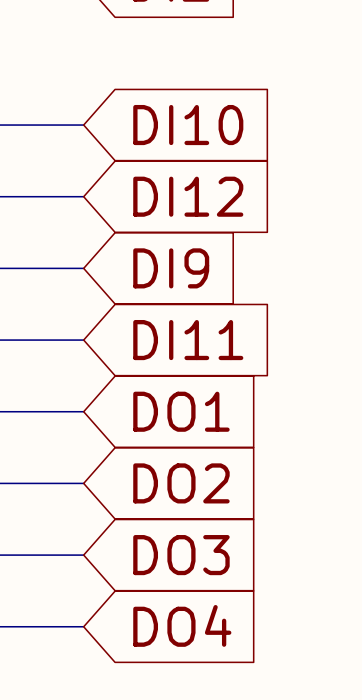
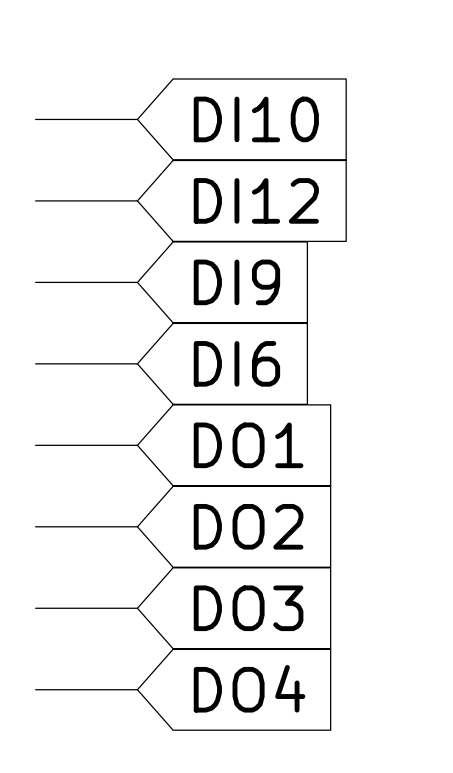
global label: DI11 (188, 340) -> DI6 (236, 363)

